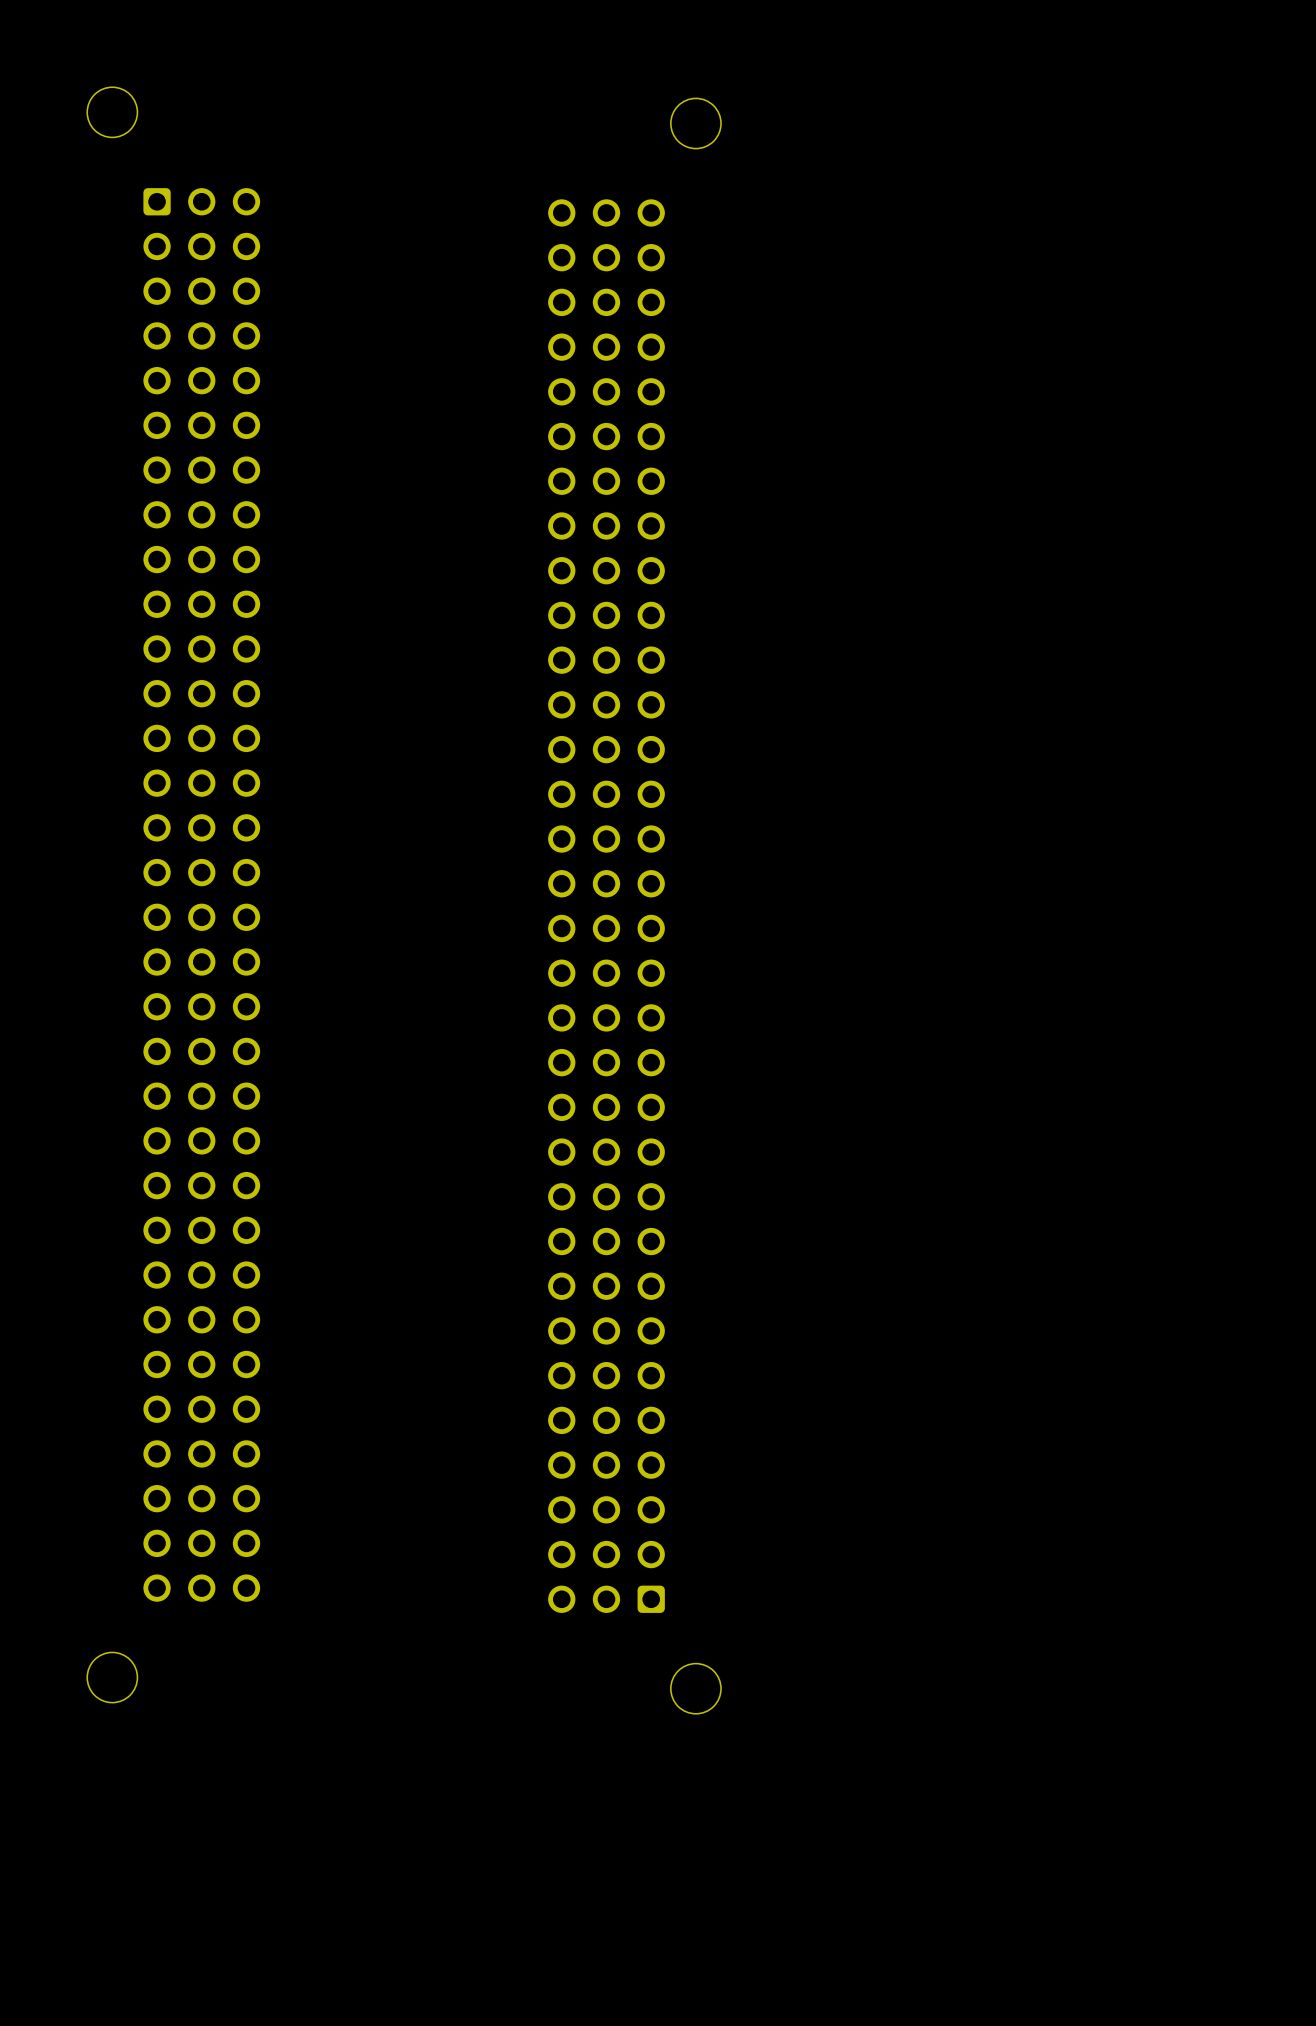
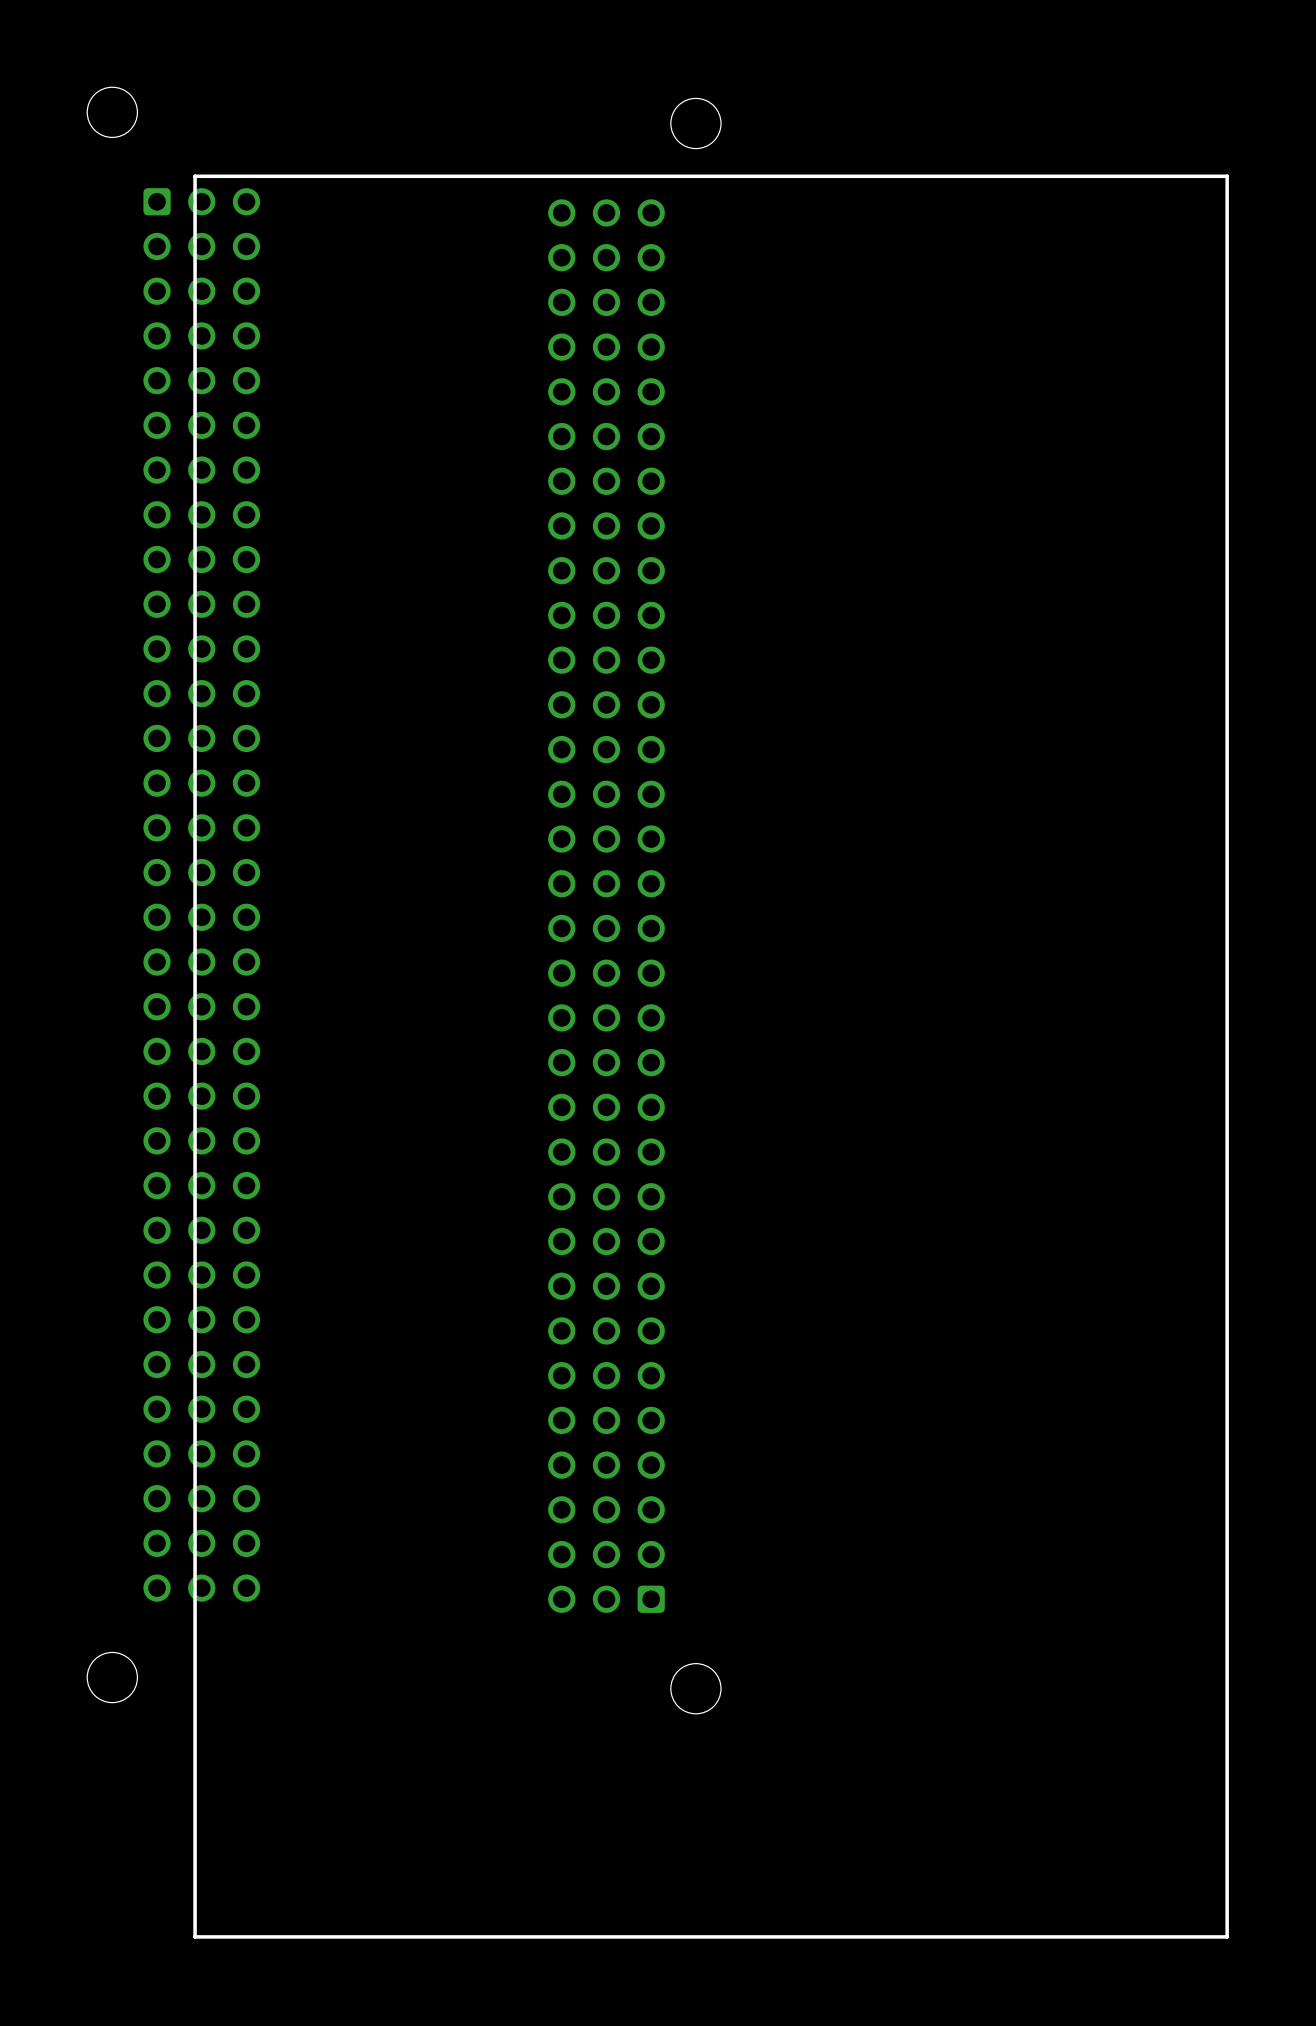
board edge: none -> (1227, 176) (195, 176) (195, 1936) (1227, 1936) (1227, 176)

